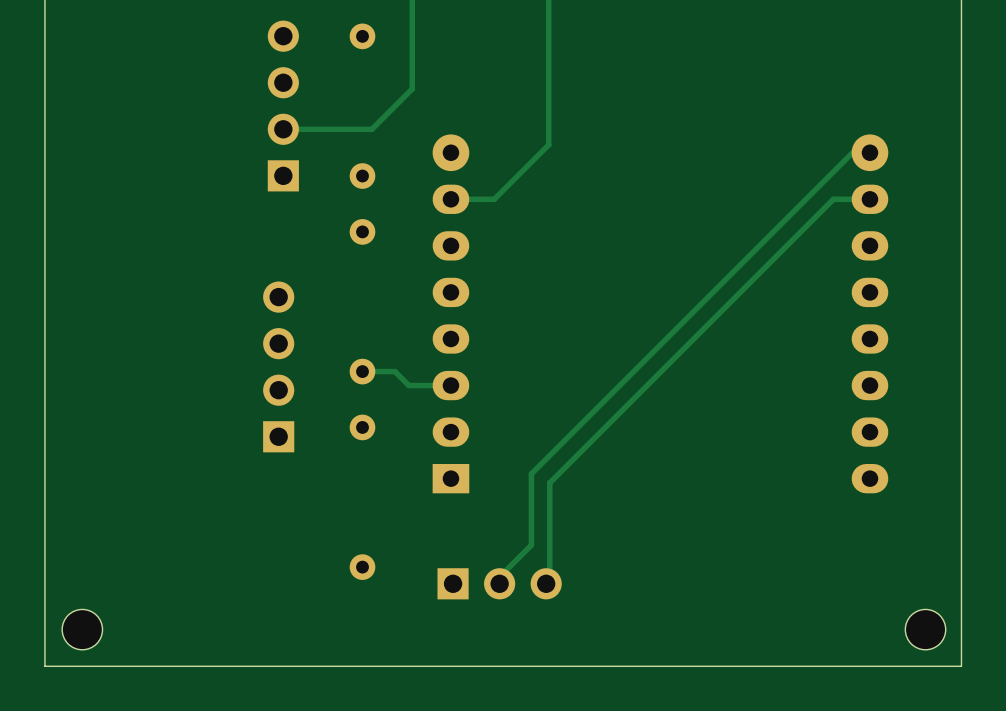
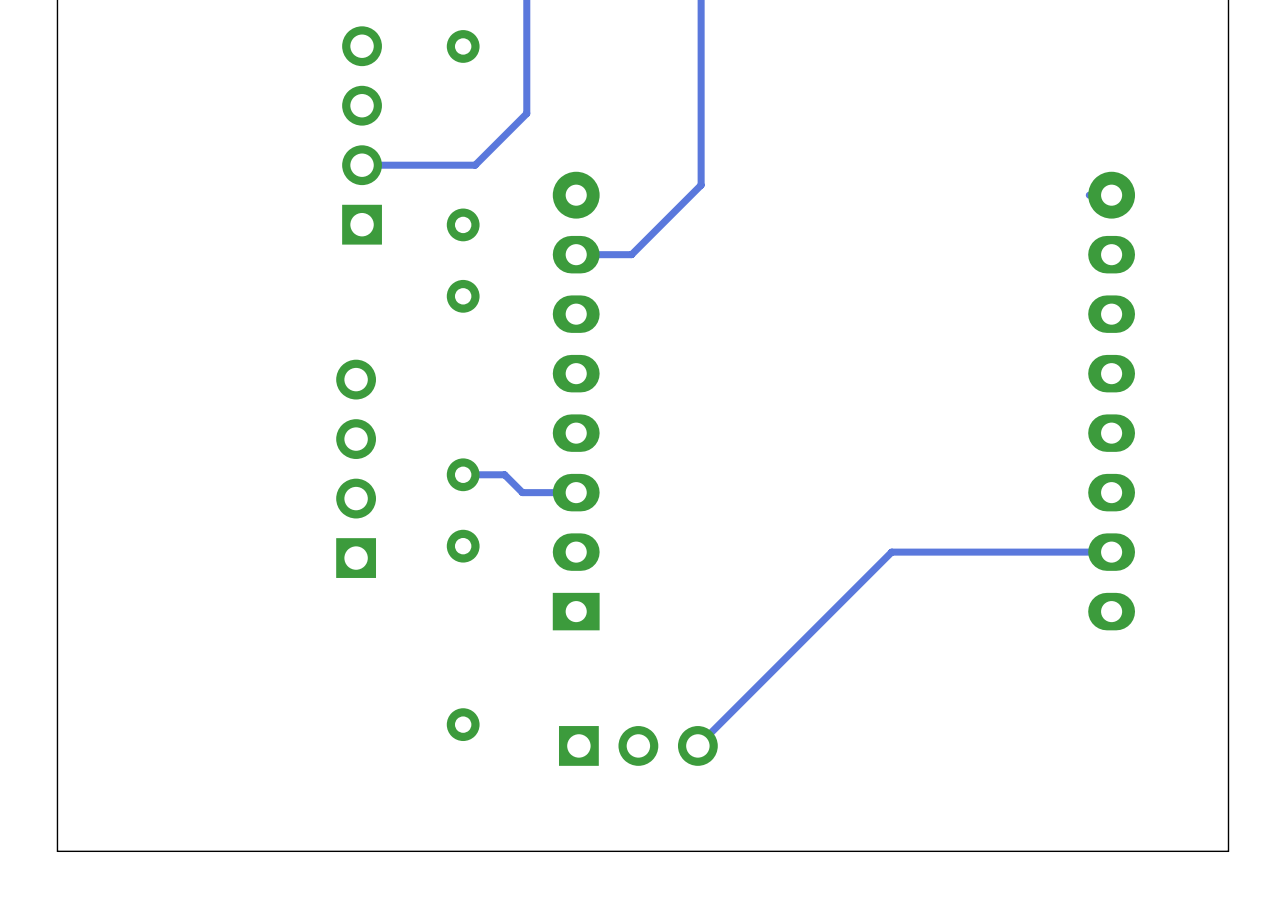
track: (852, 152) (531, 473) (531, 545) (499, 576) -> none
track: (869, 199) (833, 199) (549, 482) (549, 589) -> none
track: none -> (1111, 552) (891, 552) (697, 745)
part: (82, 629) -> none
part: (925, 629) -> none

